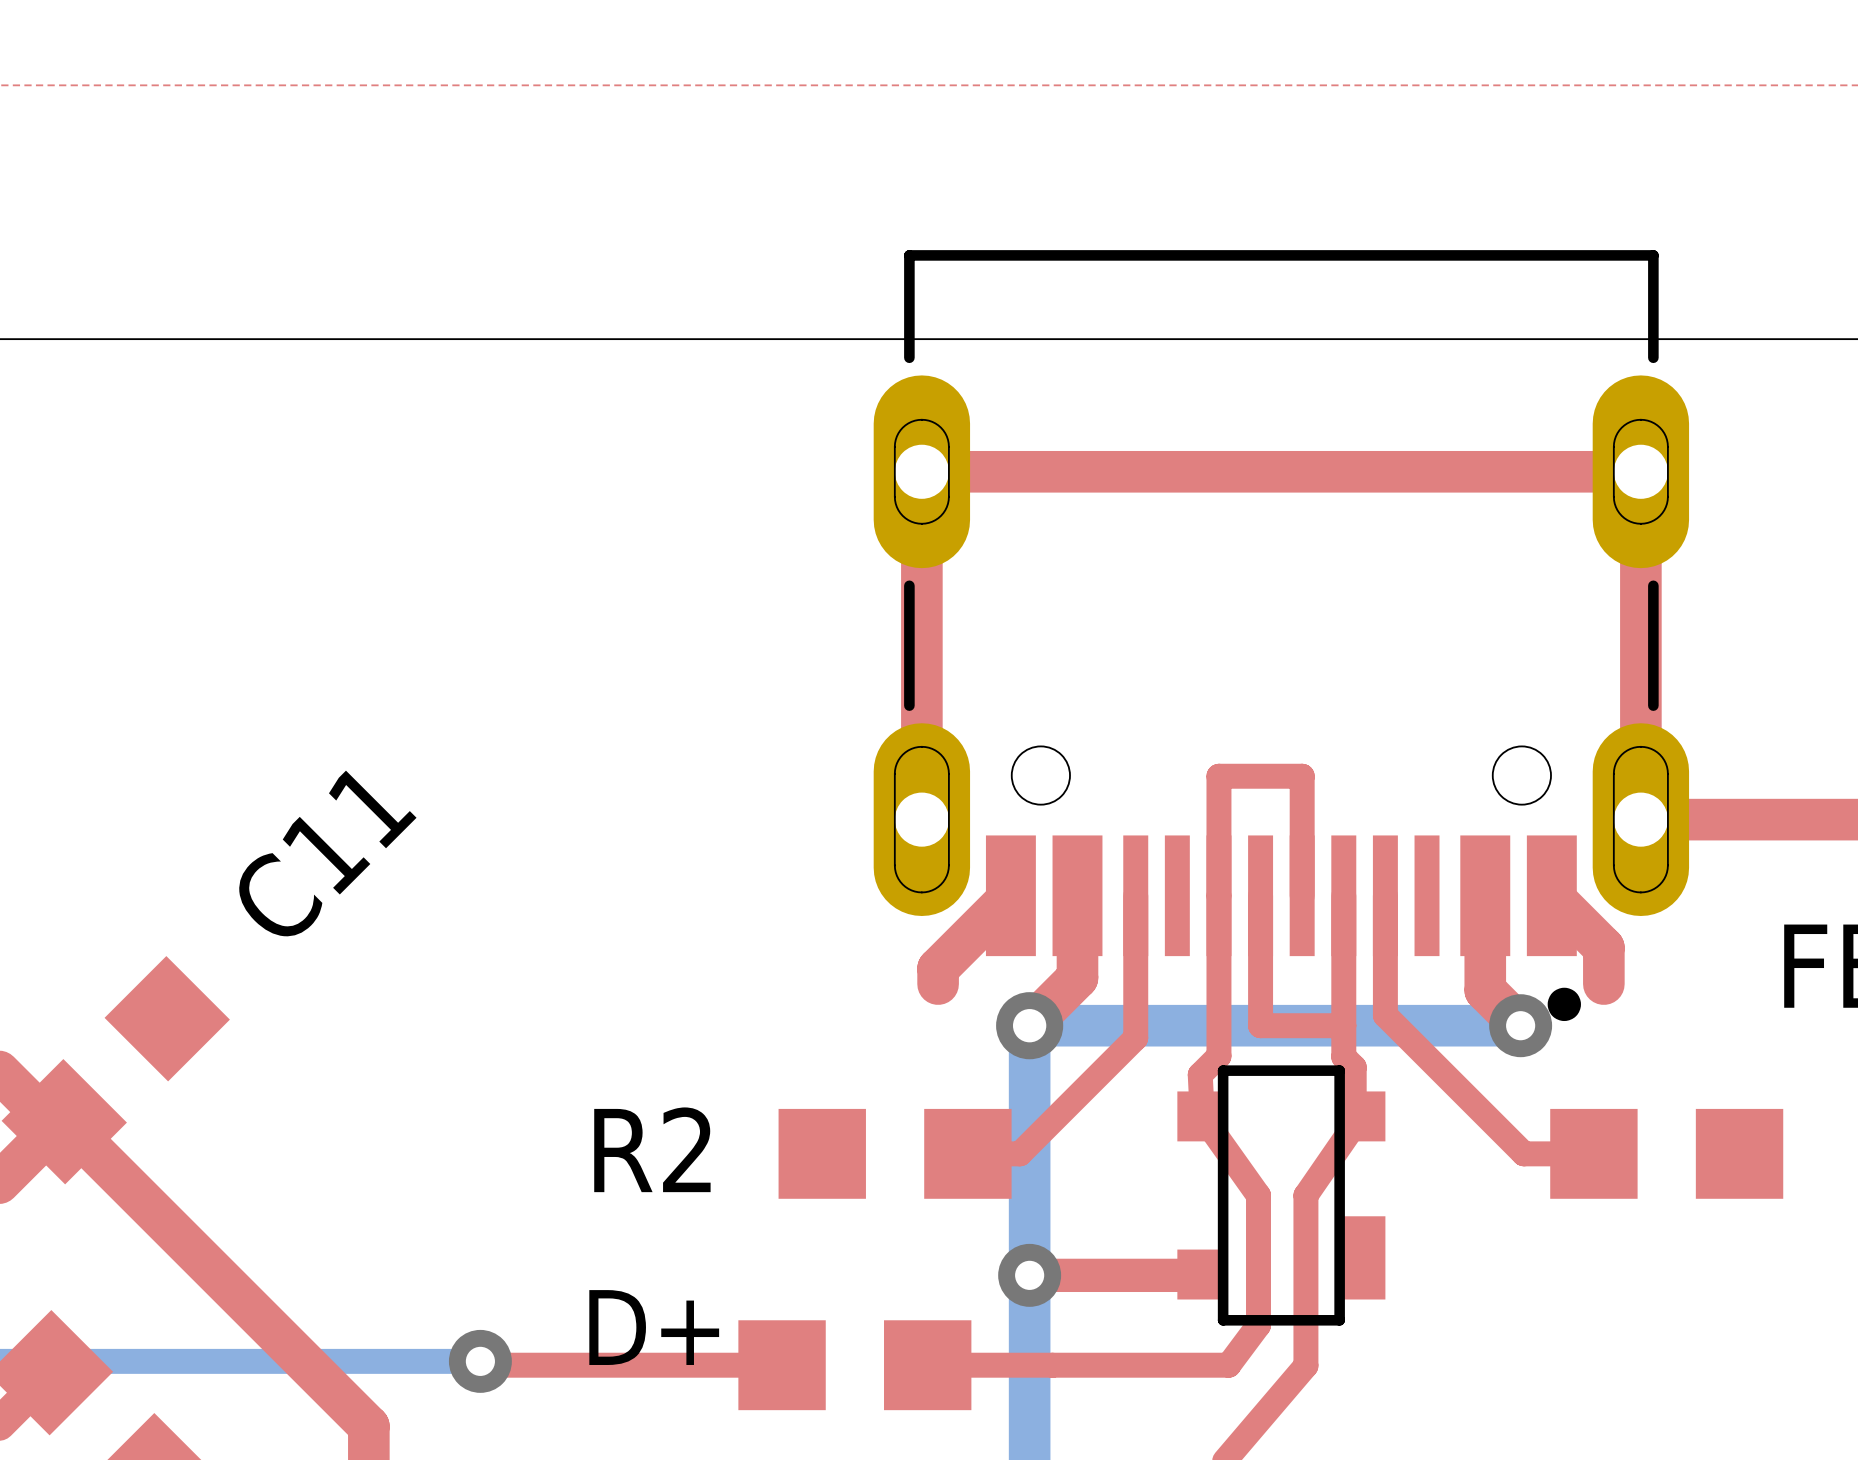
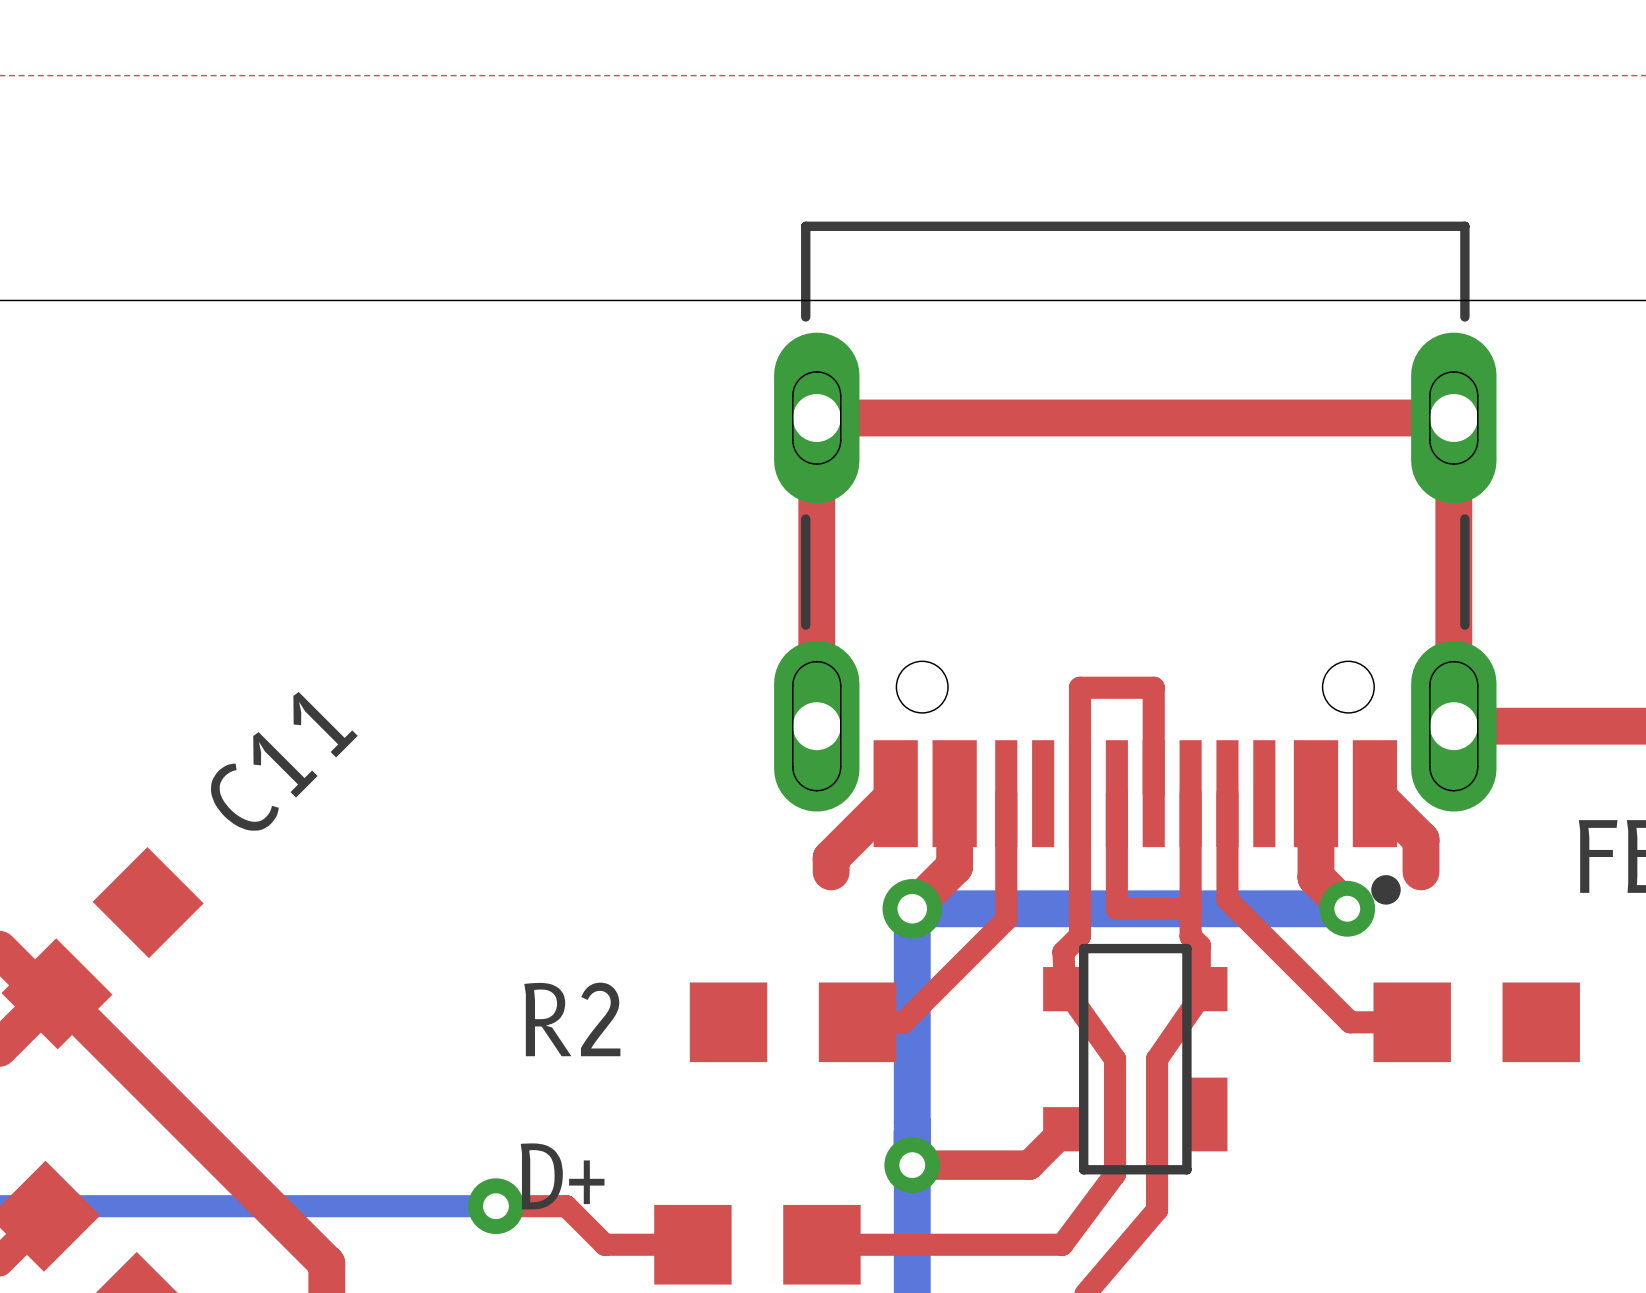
top track: (1029, 1275) (1201, 1275) -> (912, 1165) (1029, 1165) (1064, 1129)
via position: (1029, 1275) -> (912, 1165)
top track: (480, 1361) (484, 1365) (782, 1365) -> none
bottom track: none -> (425, 1206) (495, 1206)
via: (480, 1361) -> none
top track: none -> (495, 1206) (566, 1206) (604, 1244) (692, 1244)
via: none -> (495, 1206)
part position: (854, 1365) -> (757, 1244)
top track: (927, 1365) (1228, 1365) -> (821, 1244) (1062, 1244) (1088, 1209)

